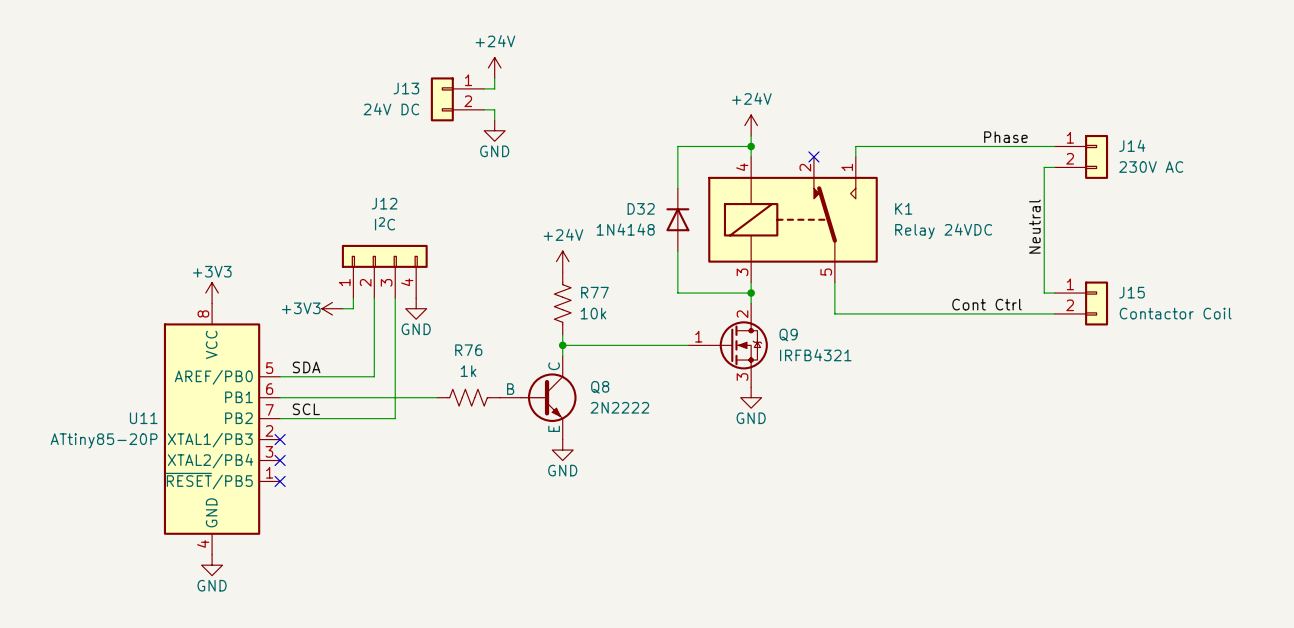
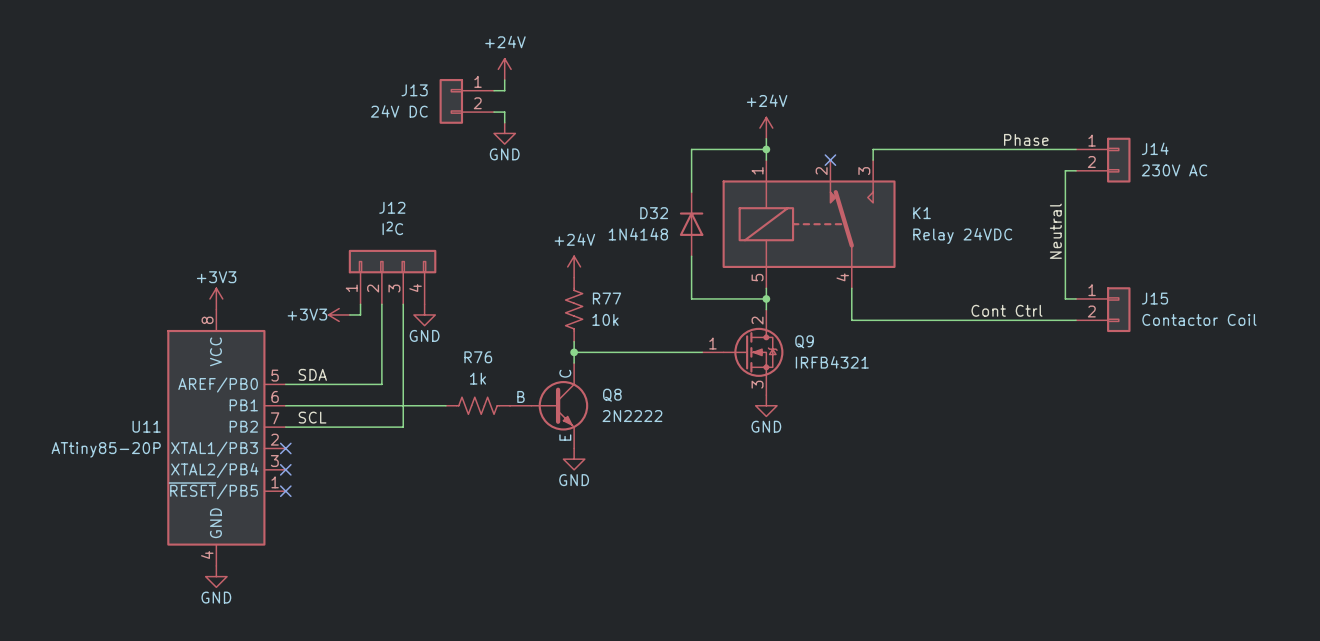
K1 pin number: 4 (742, 167) -> 1 (757, 170)
K1 pin number: 1 (847, 167) -> 3 (864, 171)
K1 pin number: 3 (742, 272) -> 5 (757, 277)
K1 pin number: 5 (826, 272) -> 4 (842, 277)

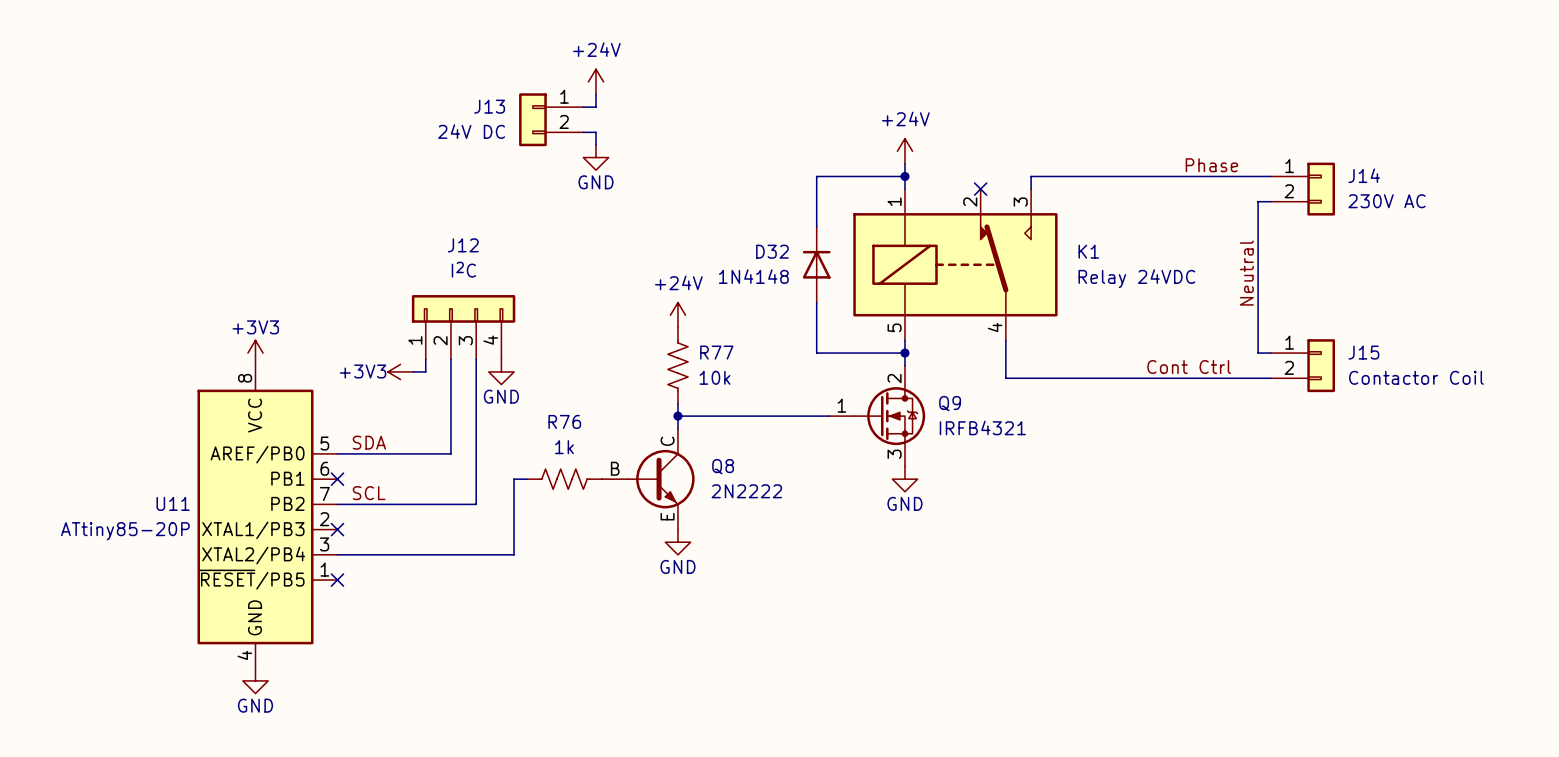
wire: (285, 405) (435, 405) -> (337, 554) (514, 554) (514, 479)
no-connect mark: none -> (337, 479)
no-connect mark: (285, 469) -> none

